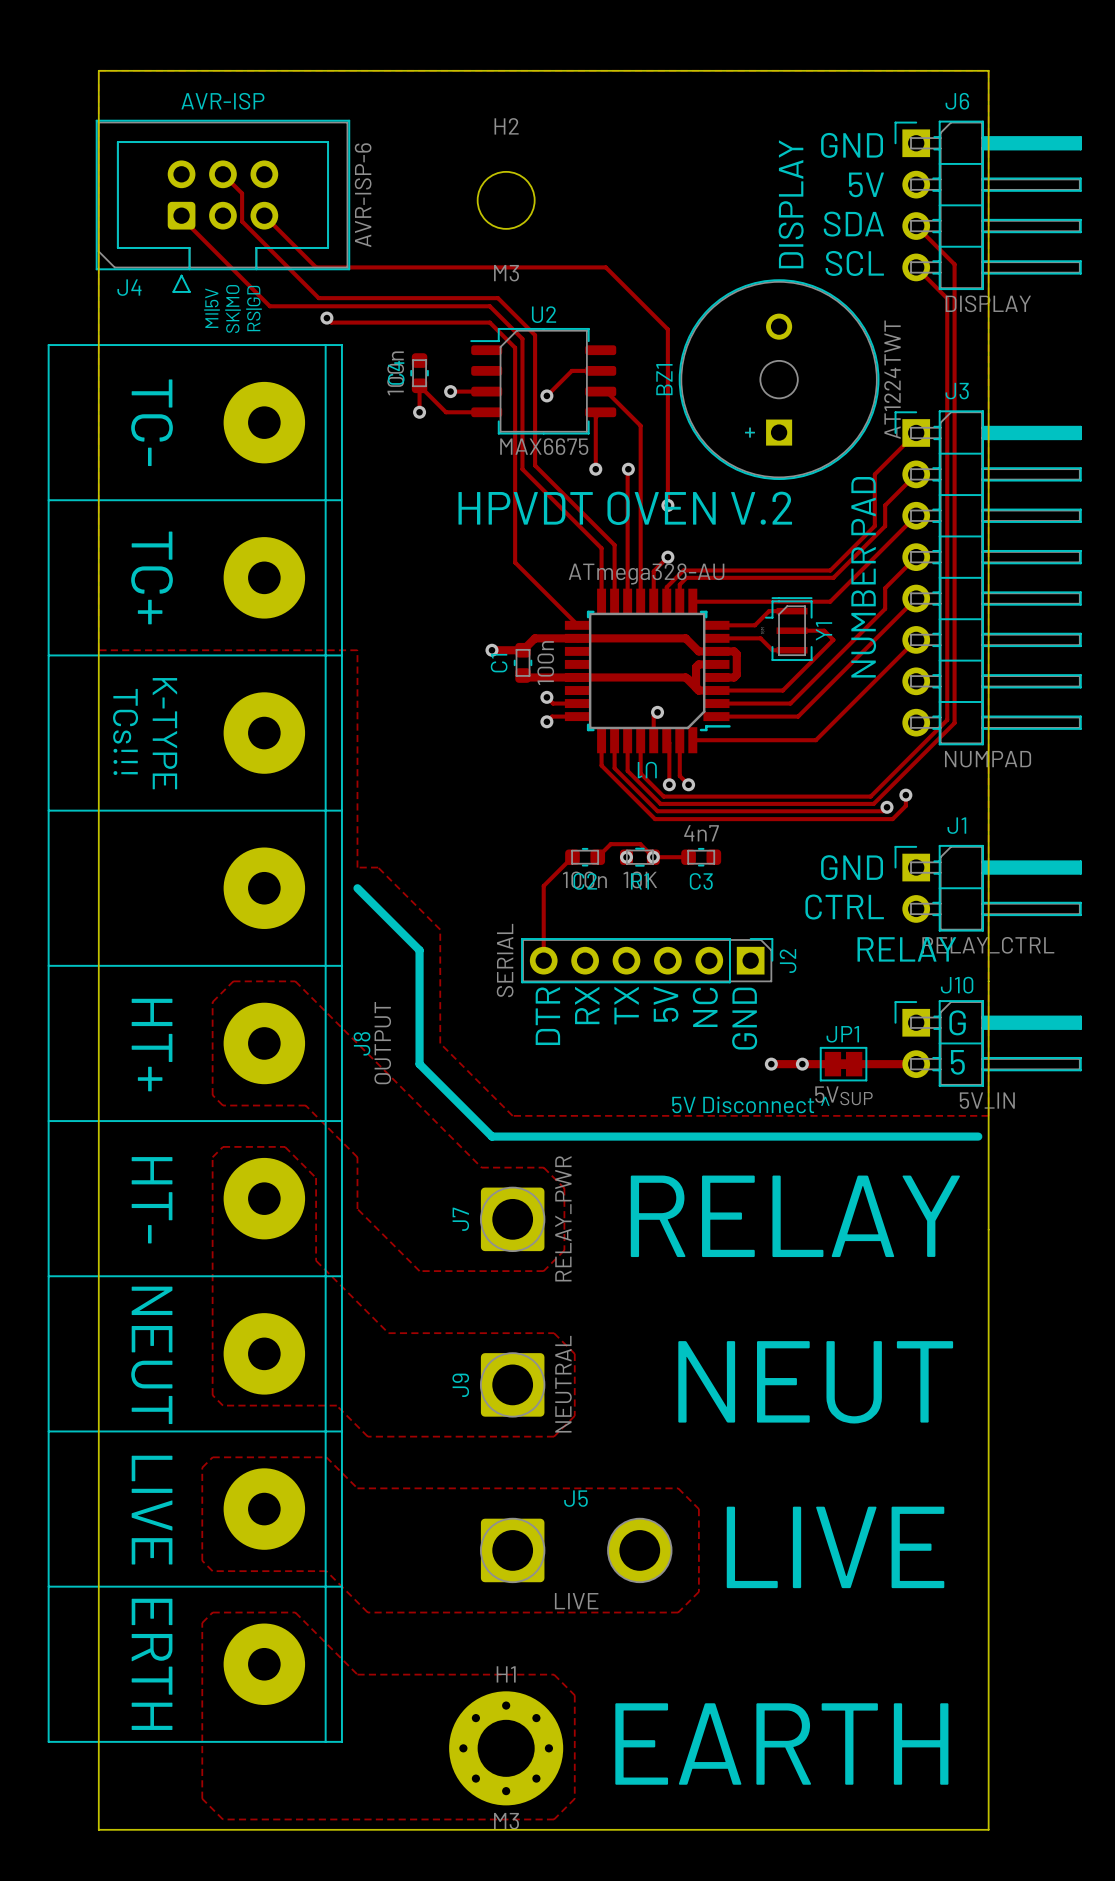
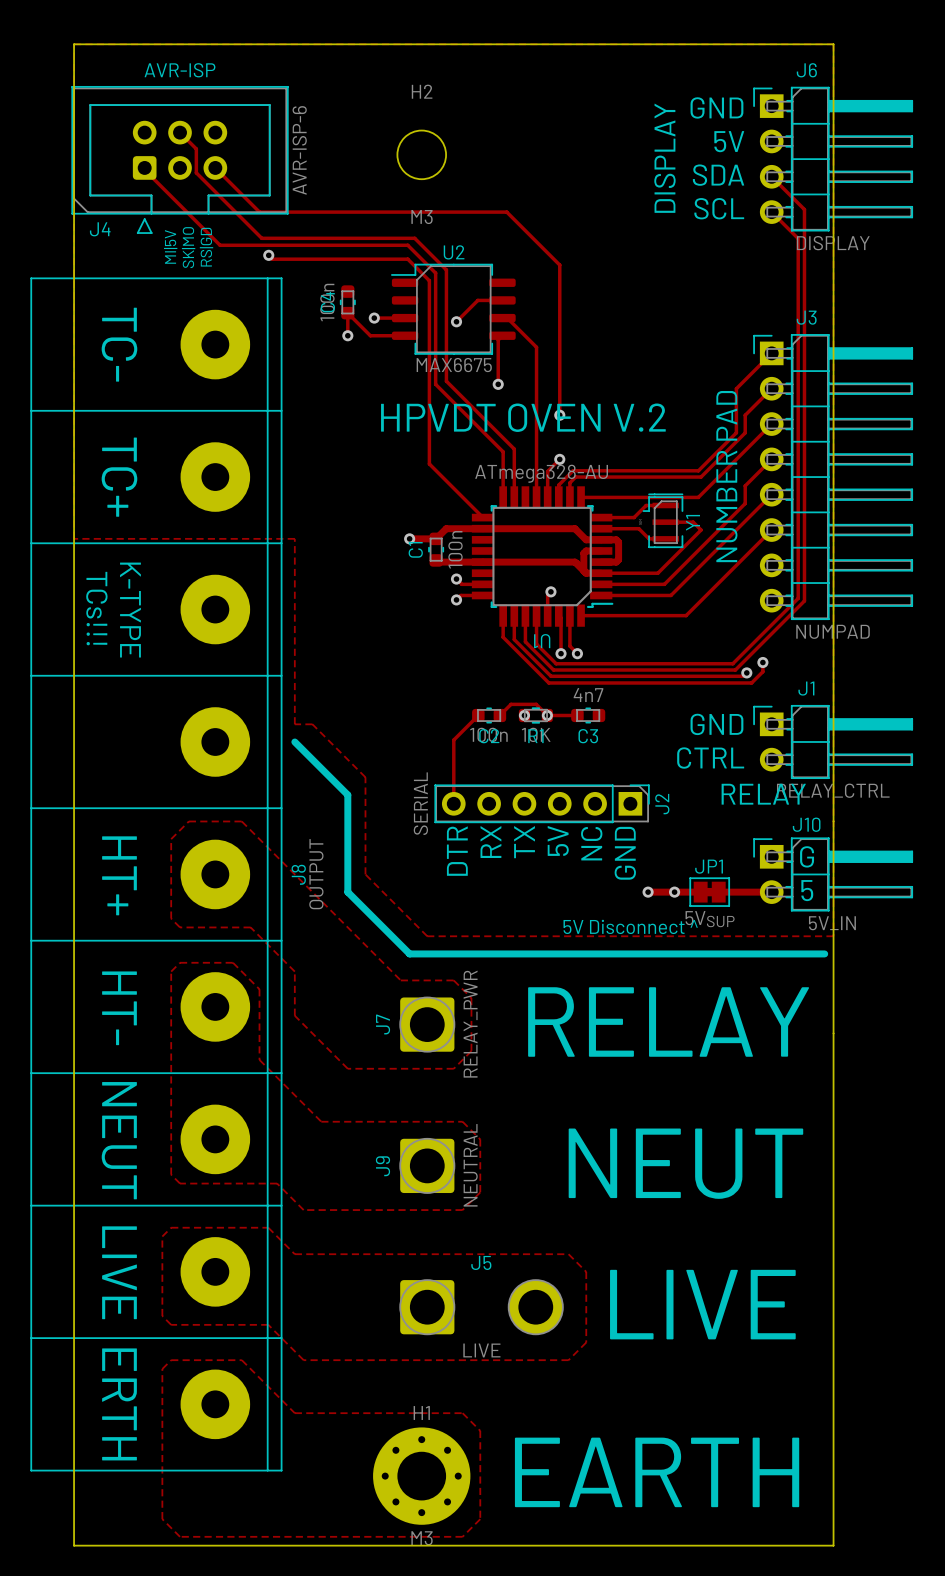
BZ1: AT1224TWT (779, 379) -> none
track: (628, 469) (627, 601) -> none
via: (628, 469) -> none

